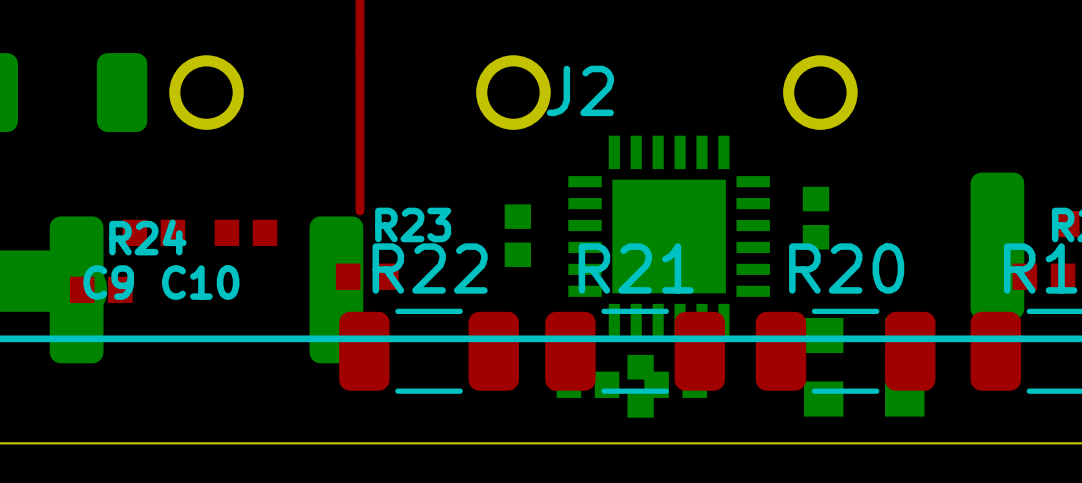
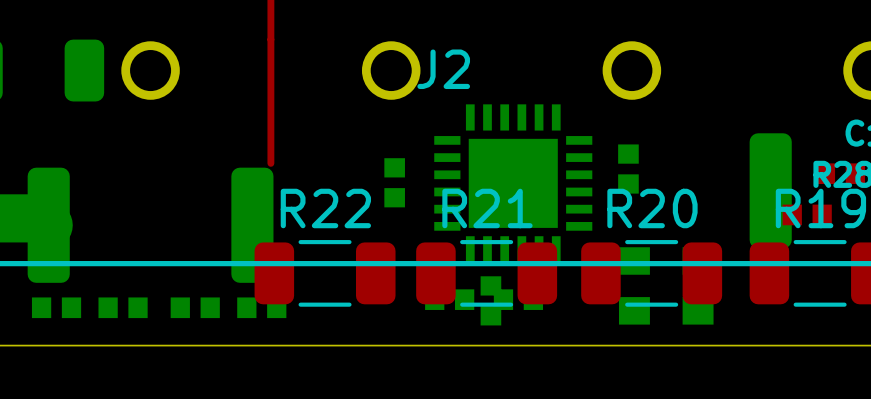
C9 side: top (153, 232) -> bottom (123, 307)
C10 side: top (245, 232) -> bottom (195, 307)
R23 side: top (367, 276) -> bottom (261, 307)
R24 side: top (101, 289) -> bottom (56, 307)

